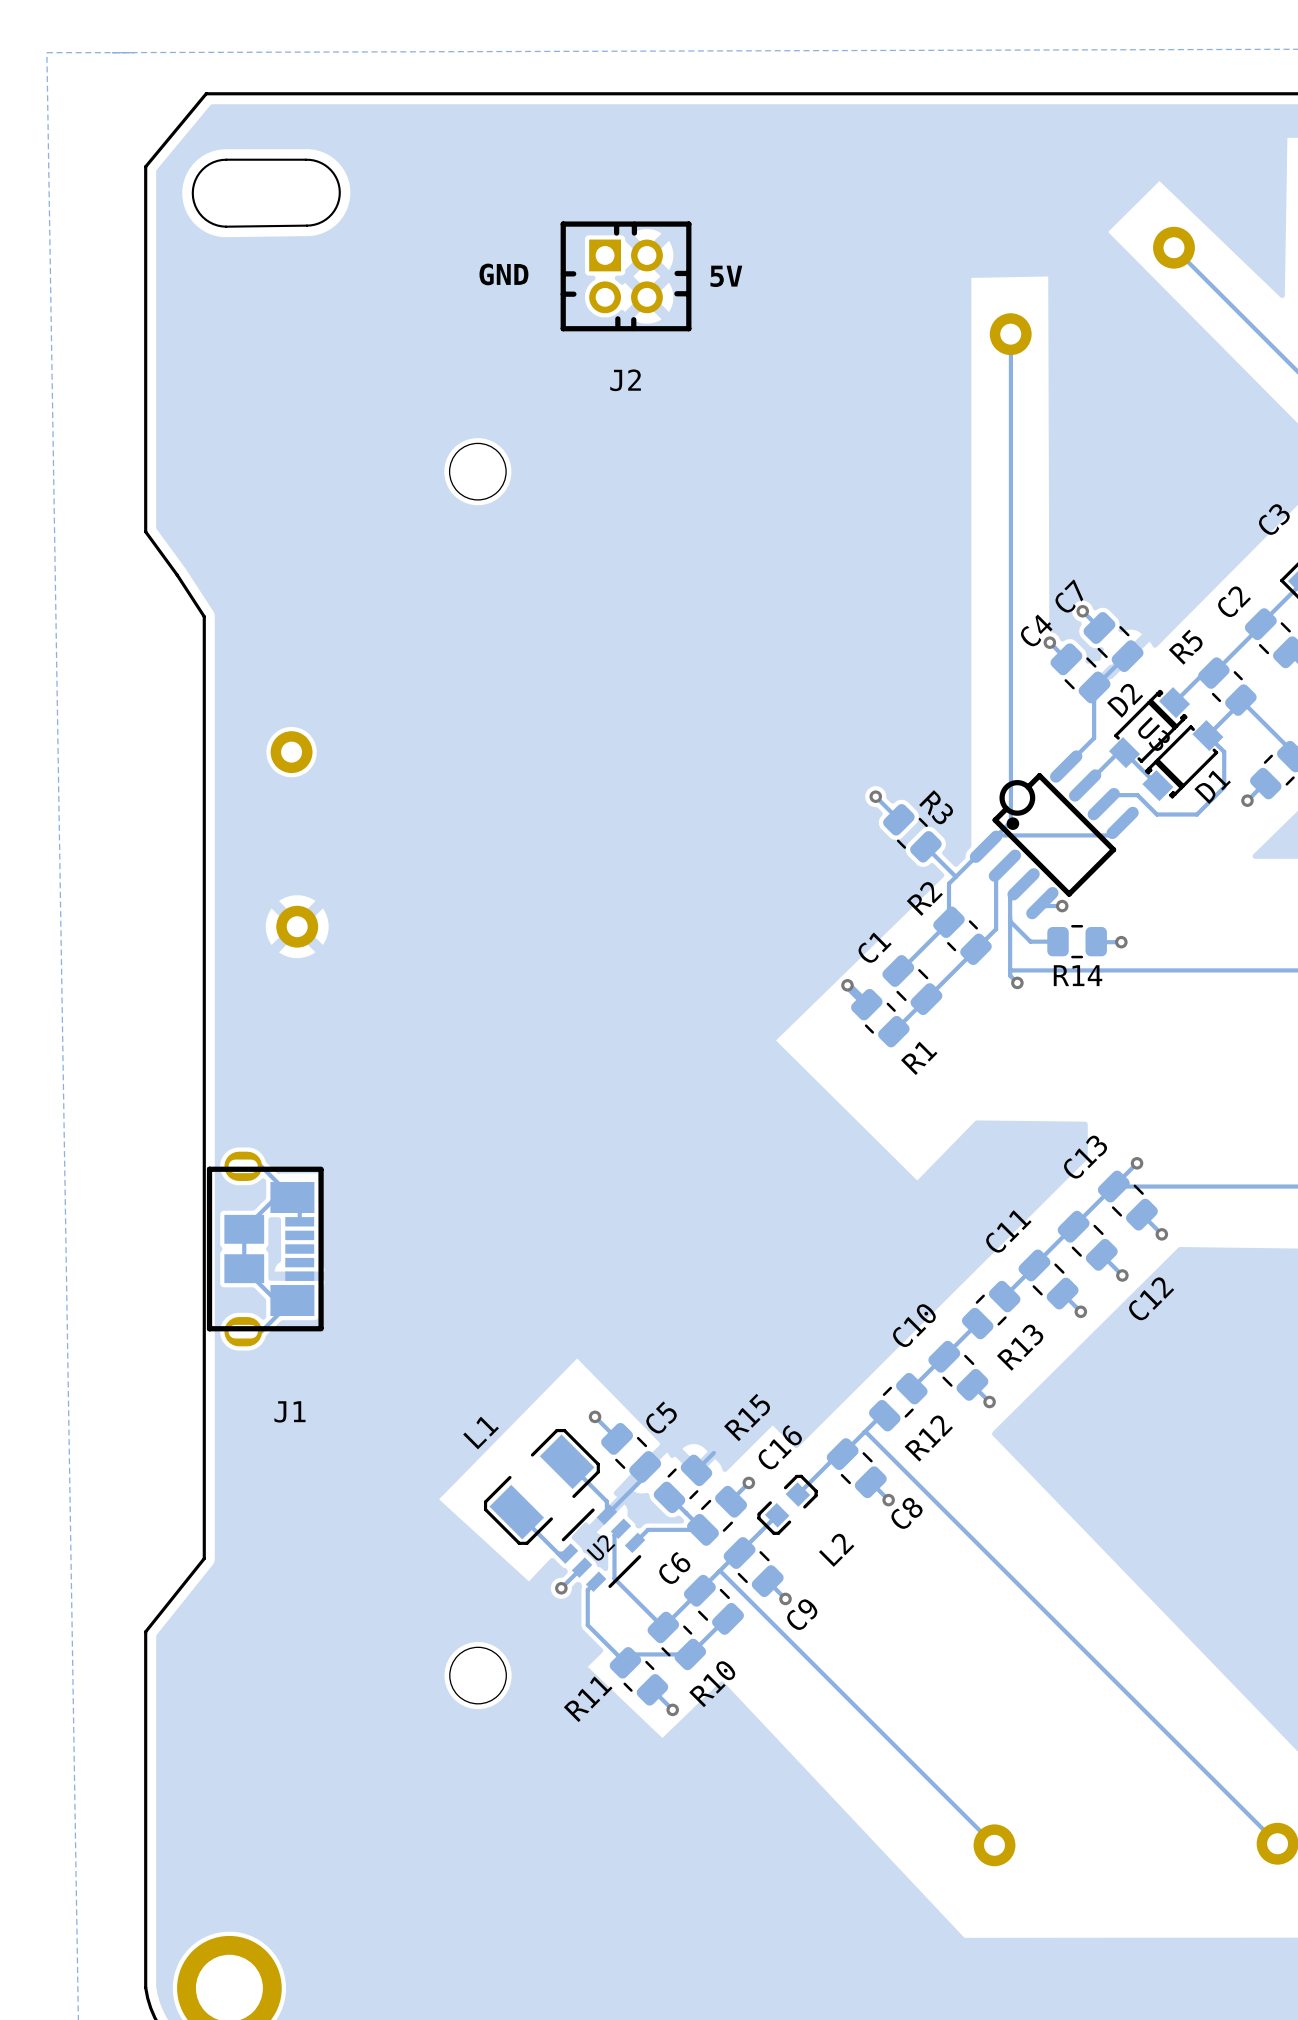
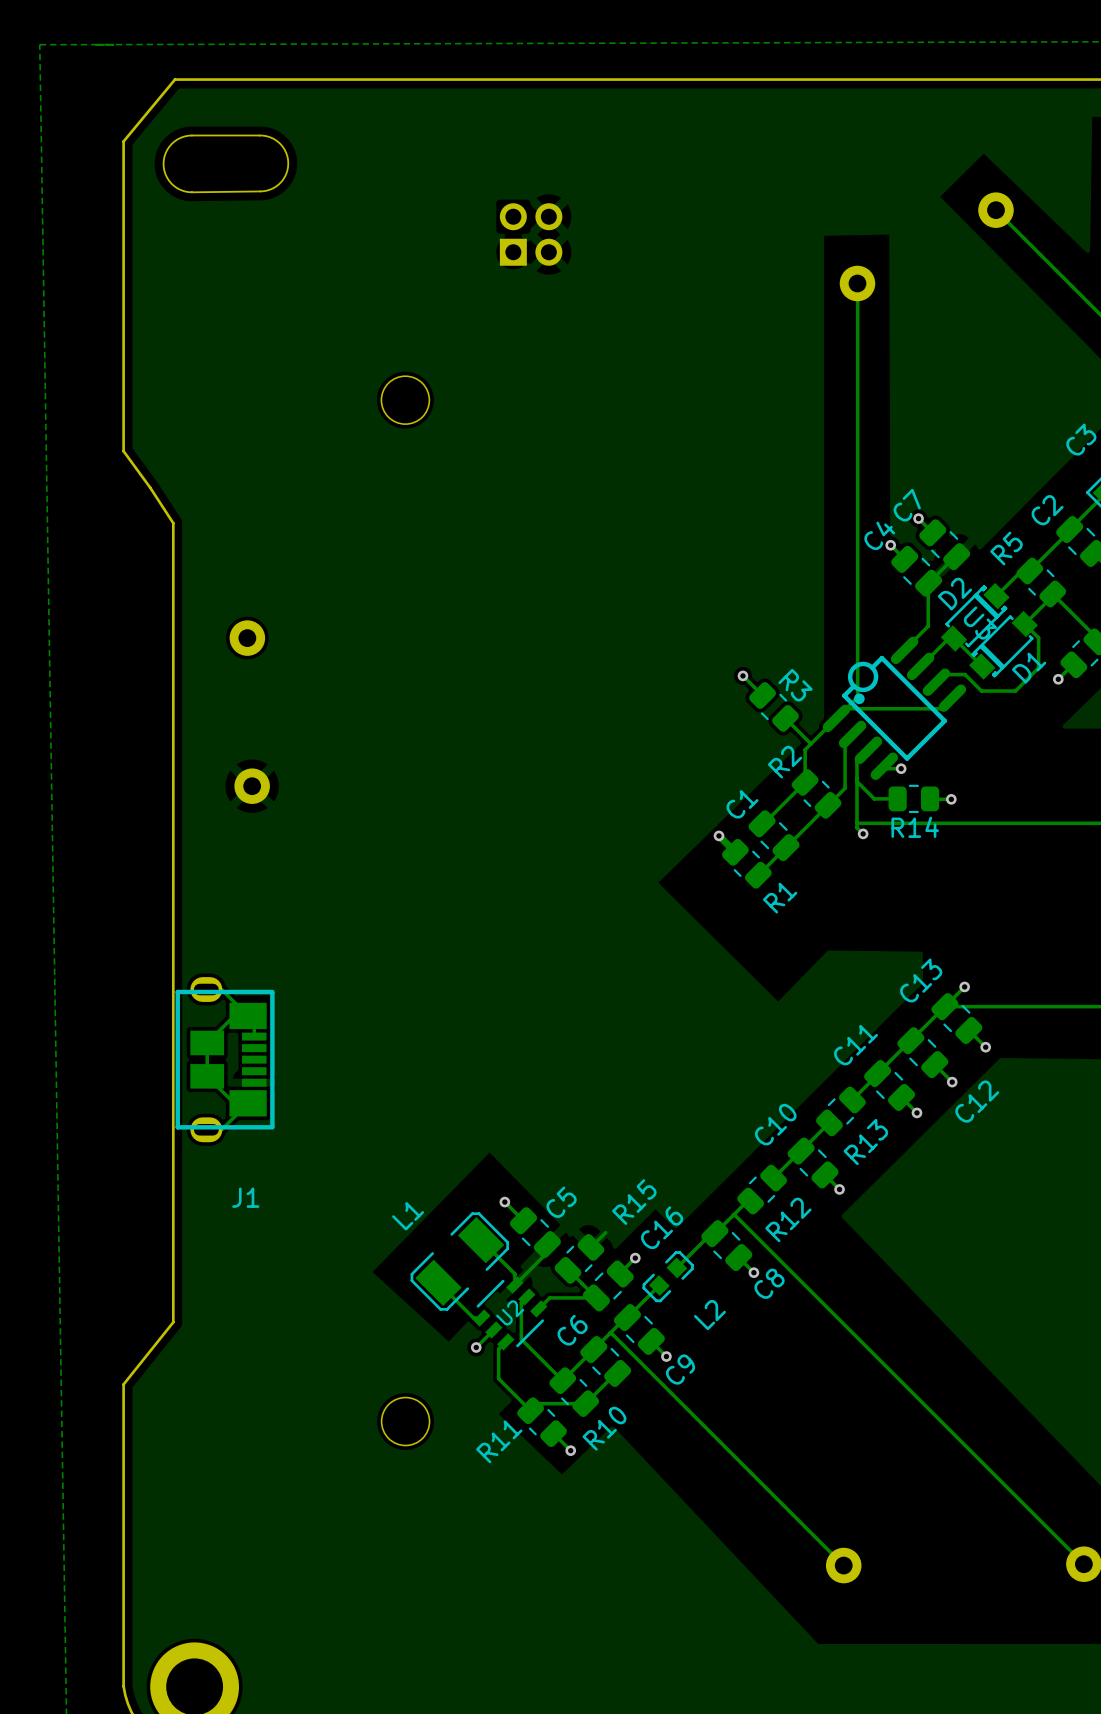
text: GND (503, 274) -> none
J2 side: bottom (626, 276) -> top (531, 234)
text: 5V (726, 276) -> none

